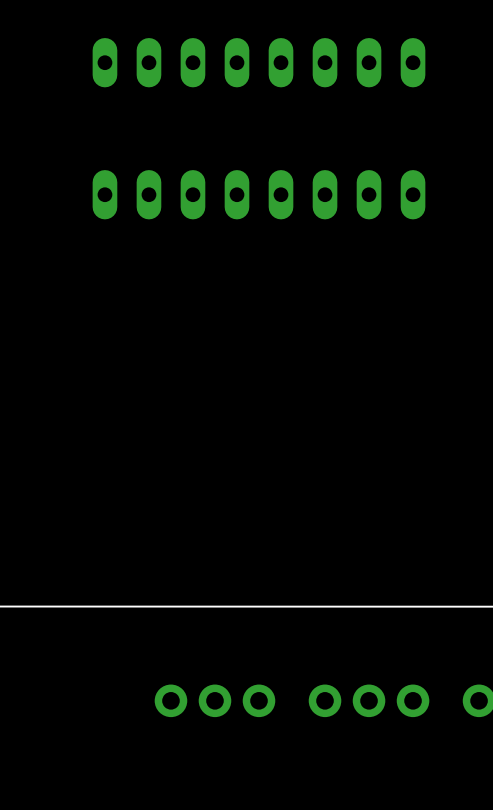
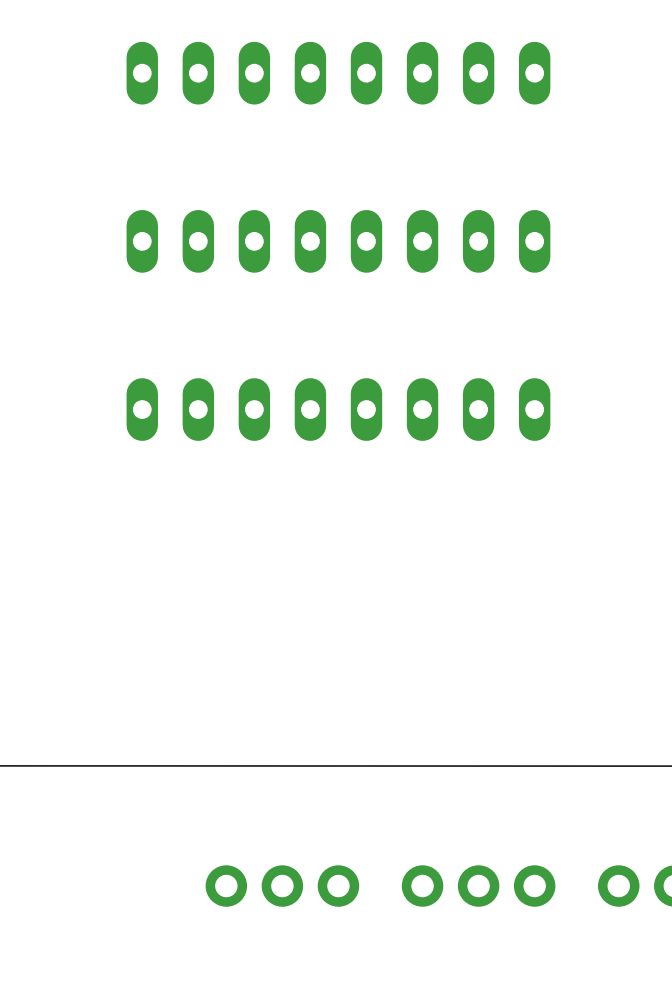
part: none -> (338, 409)

